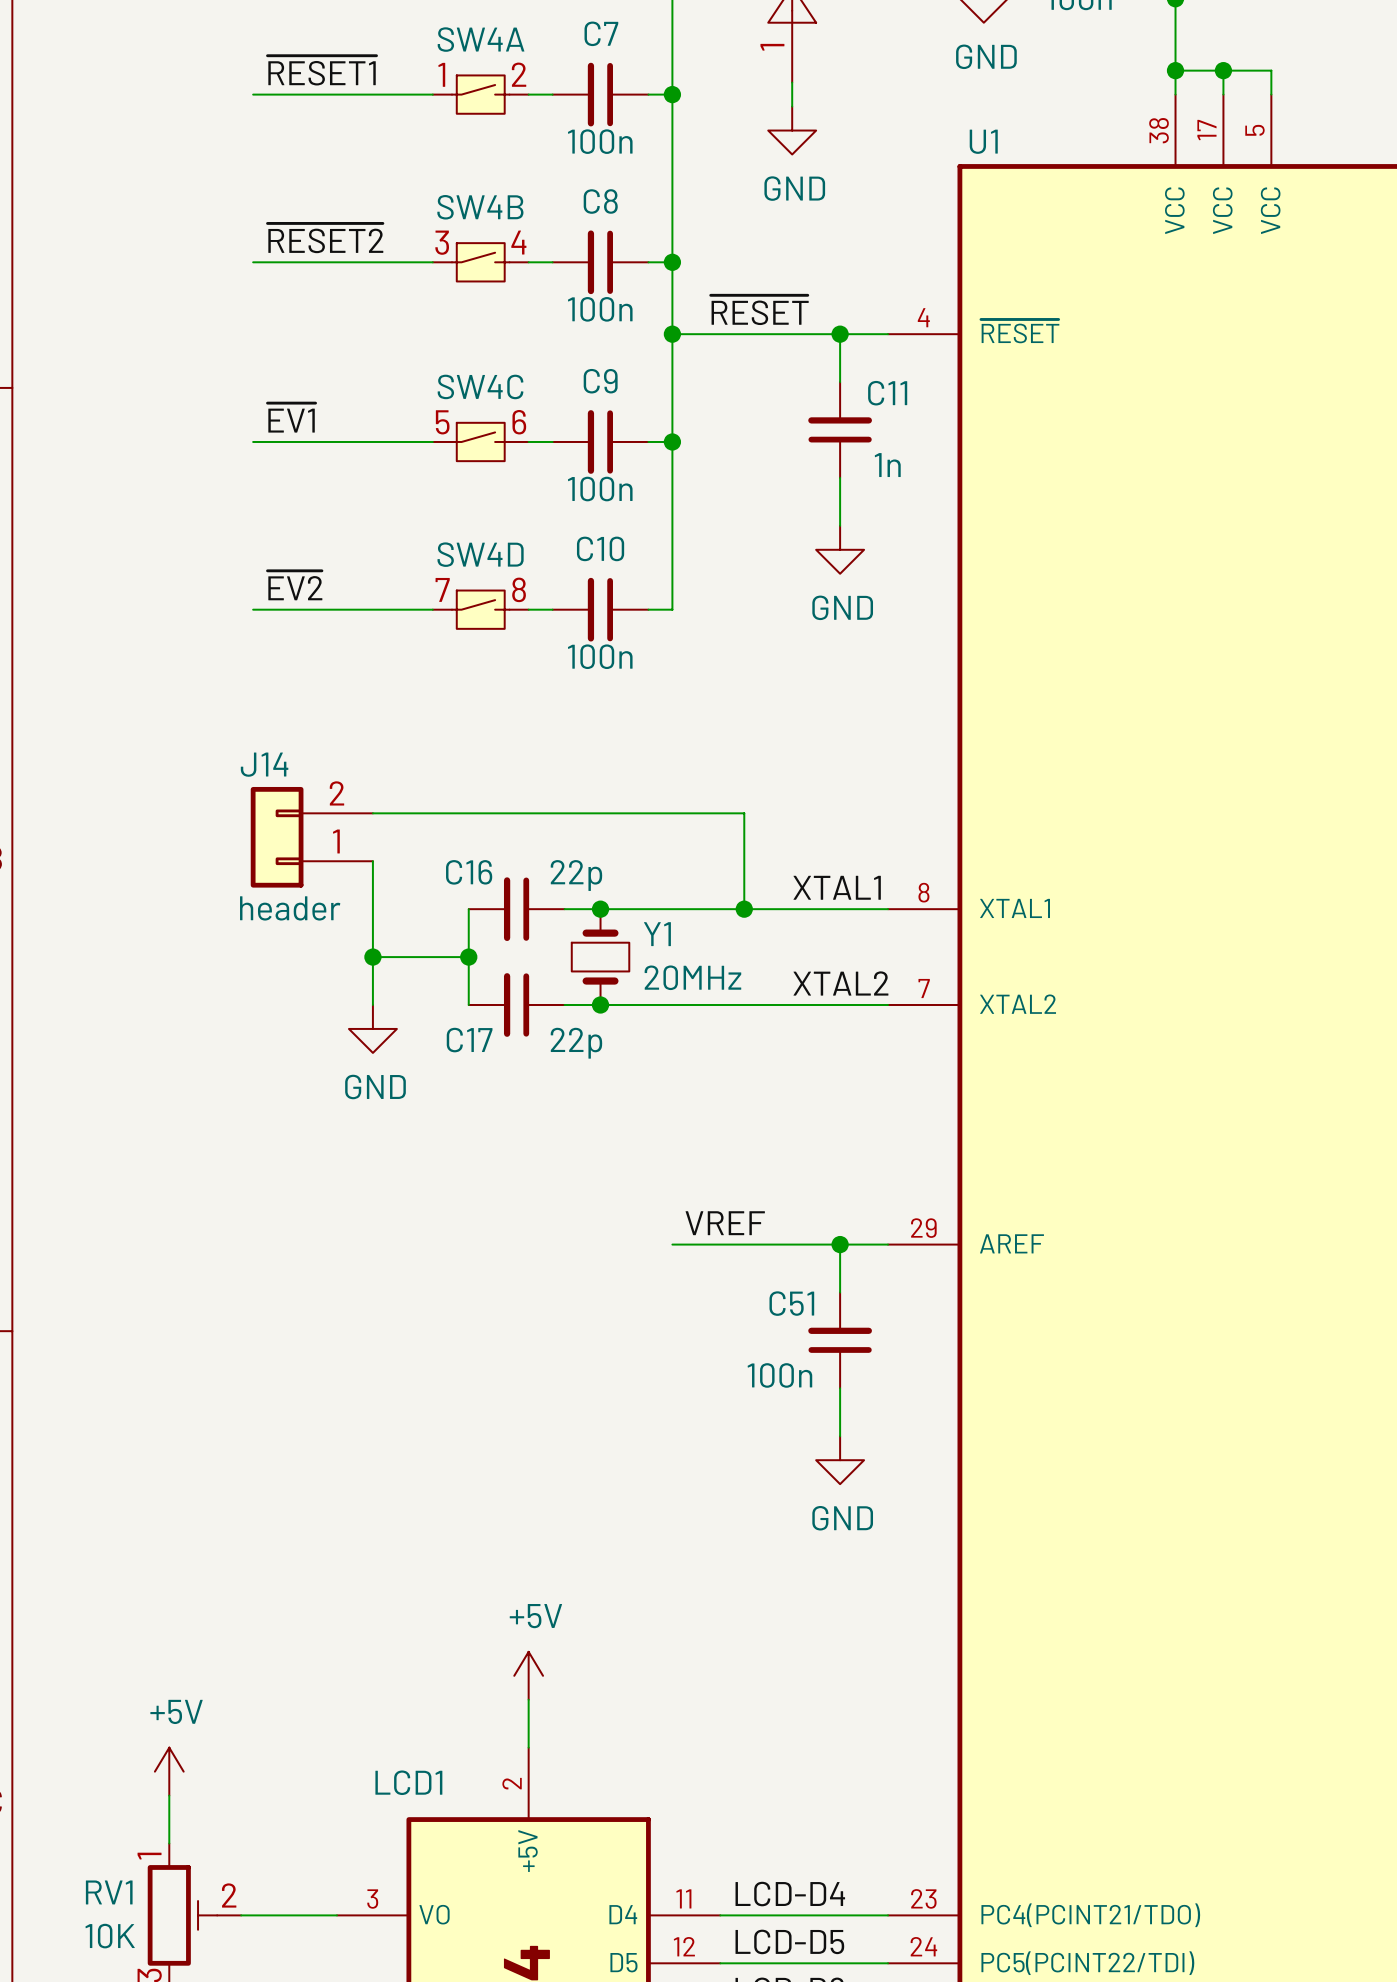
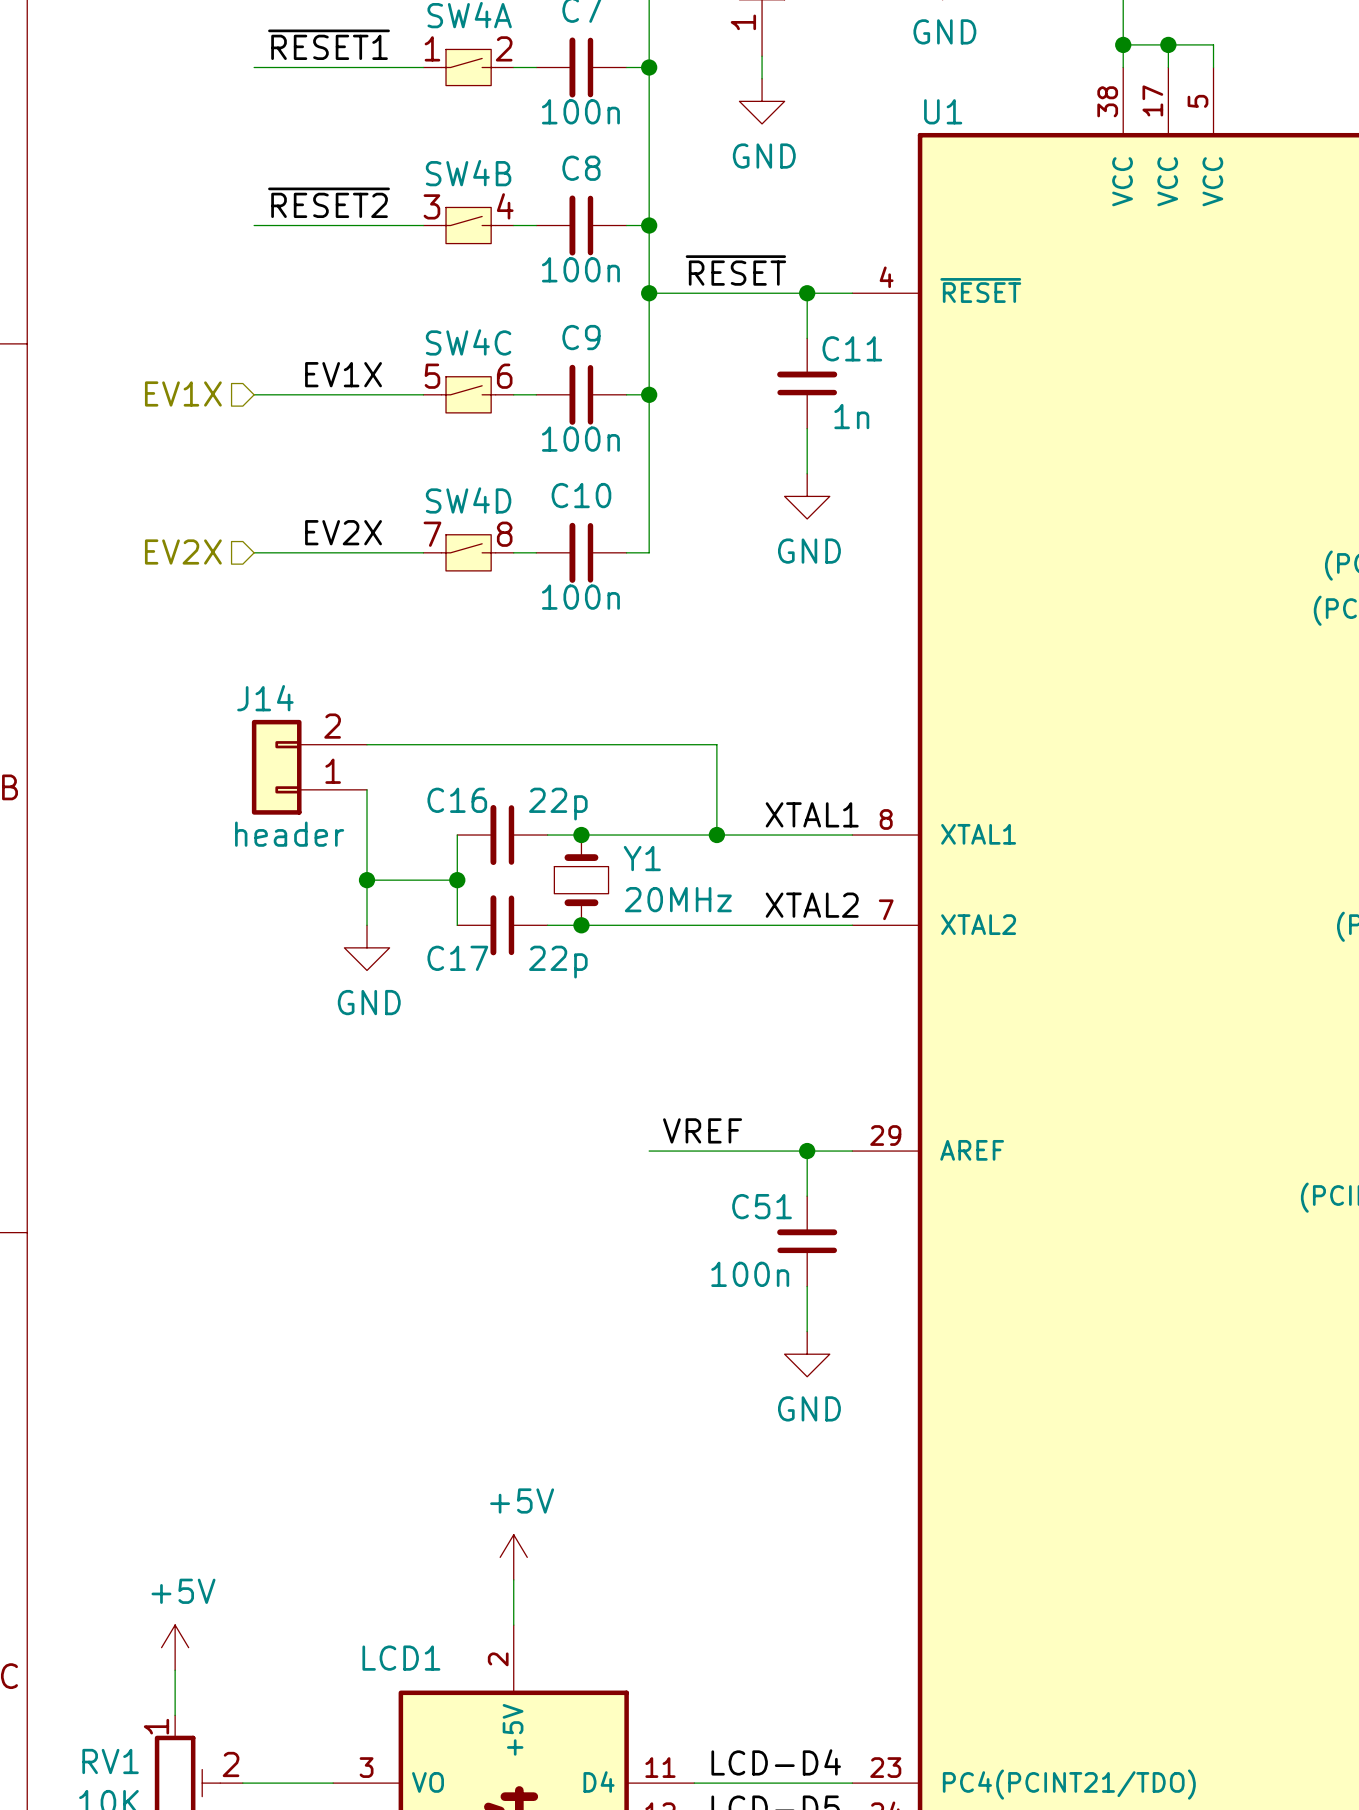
label: ~{EV1} (291, 417) -> none
label: none -> EV1X (343, 374)
hierarchical label: none -> EV1X (183, 393)
label: ~{EV2} (294, 585) -> none
label: none -> EV2X (343, 532)
hierarchical label: none -> EV2X (183, 551)

